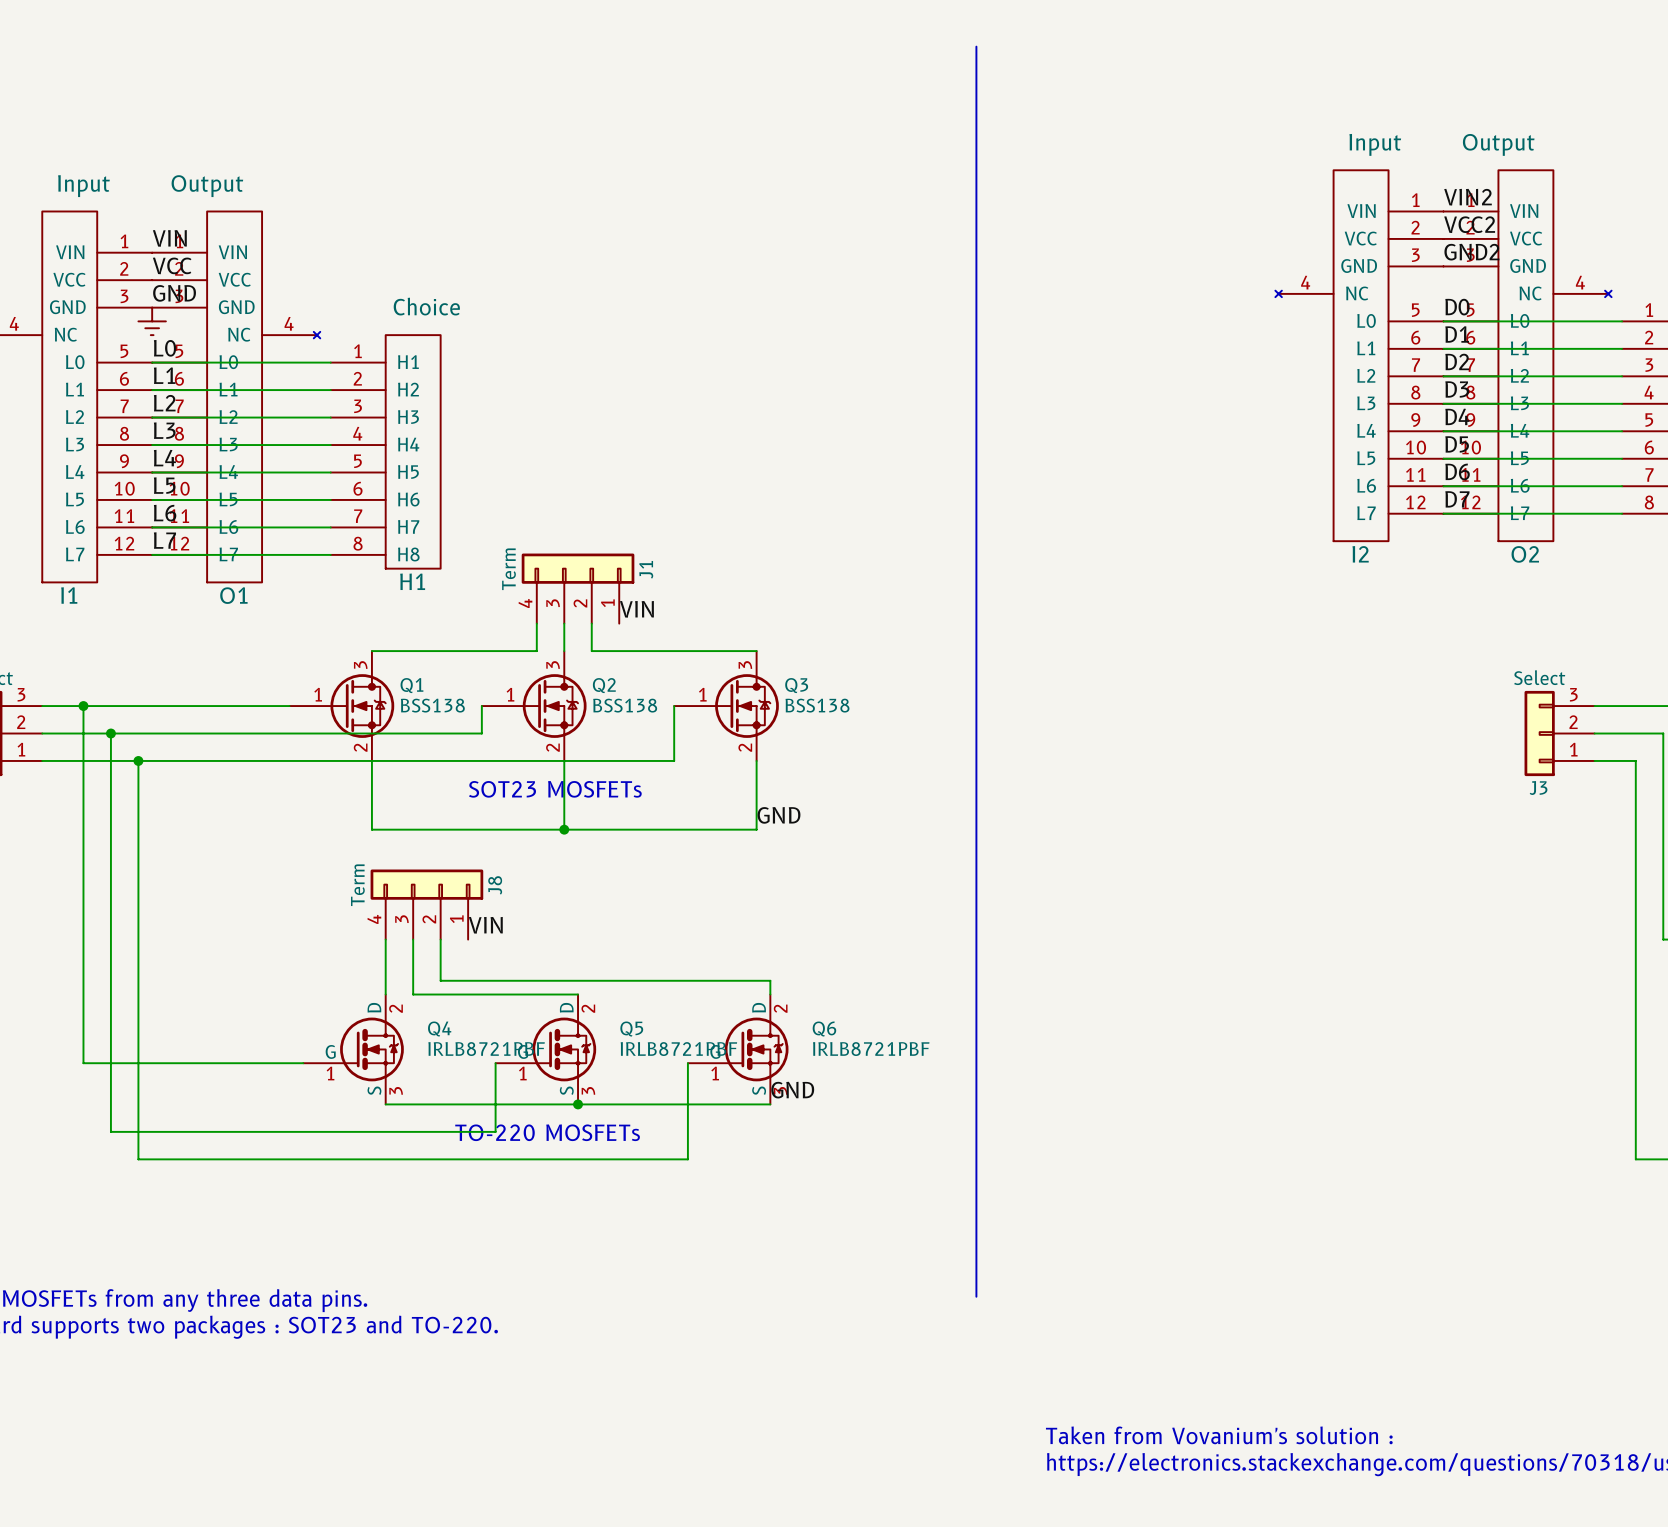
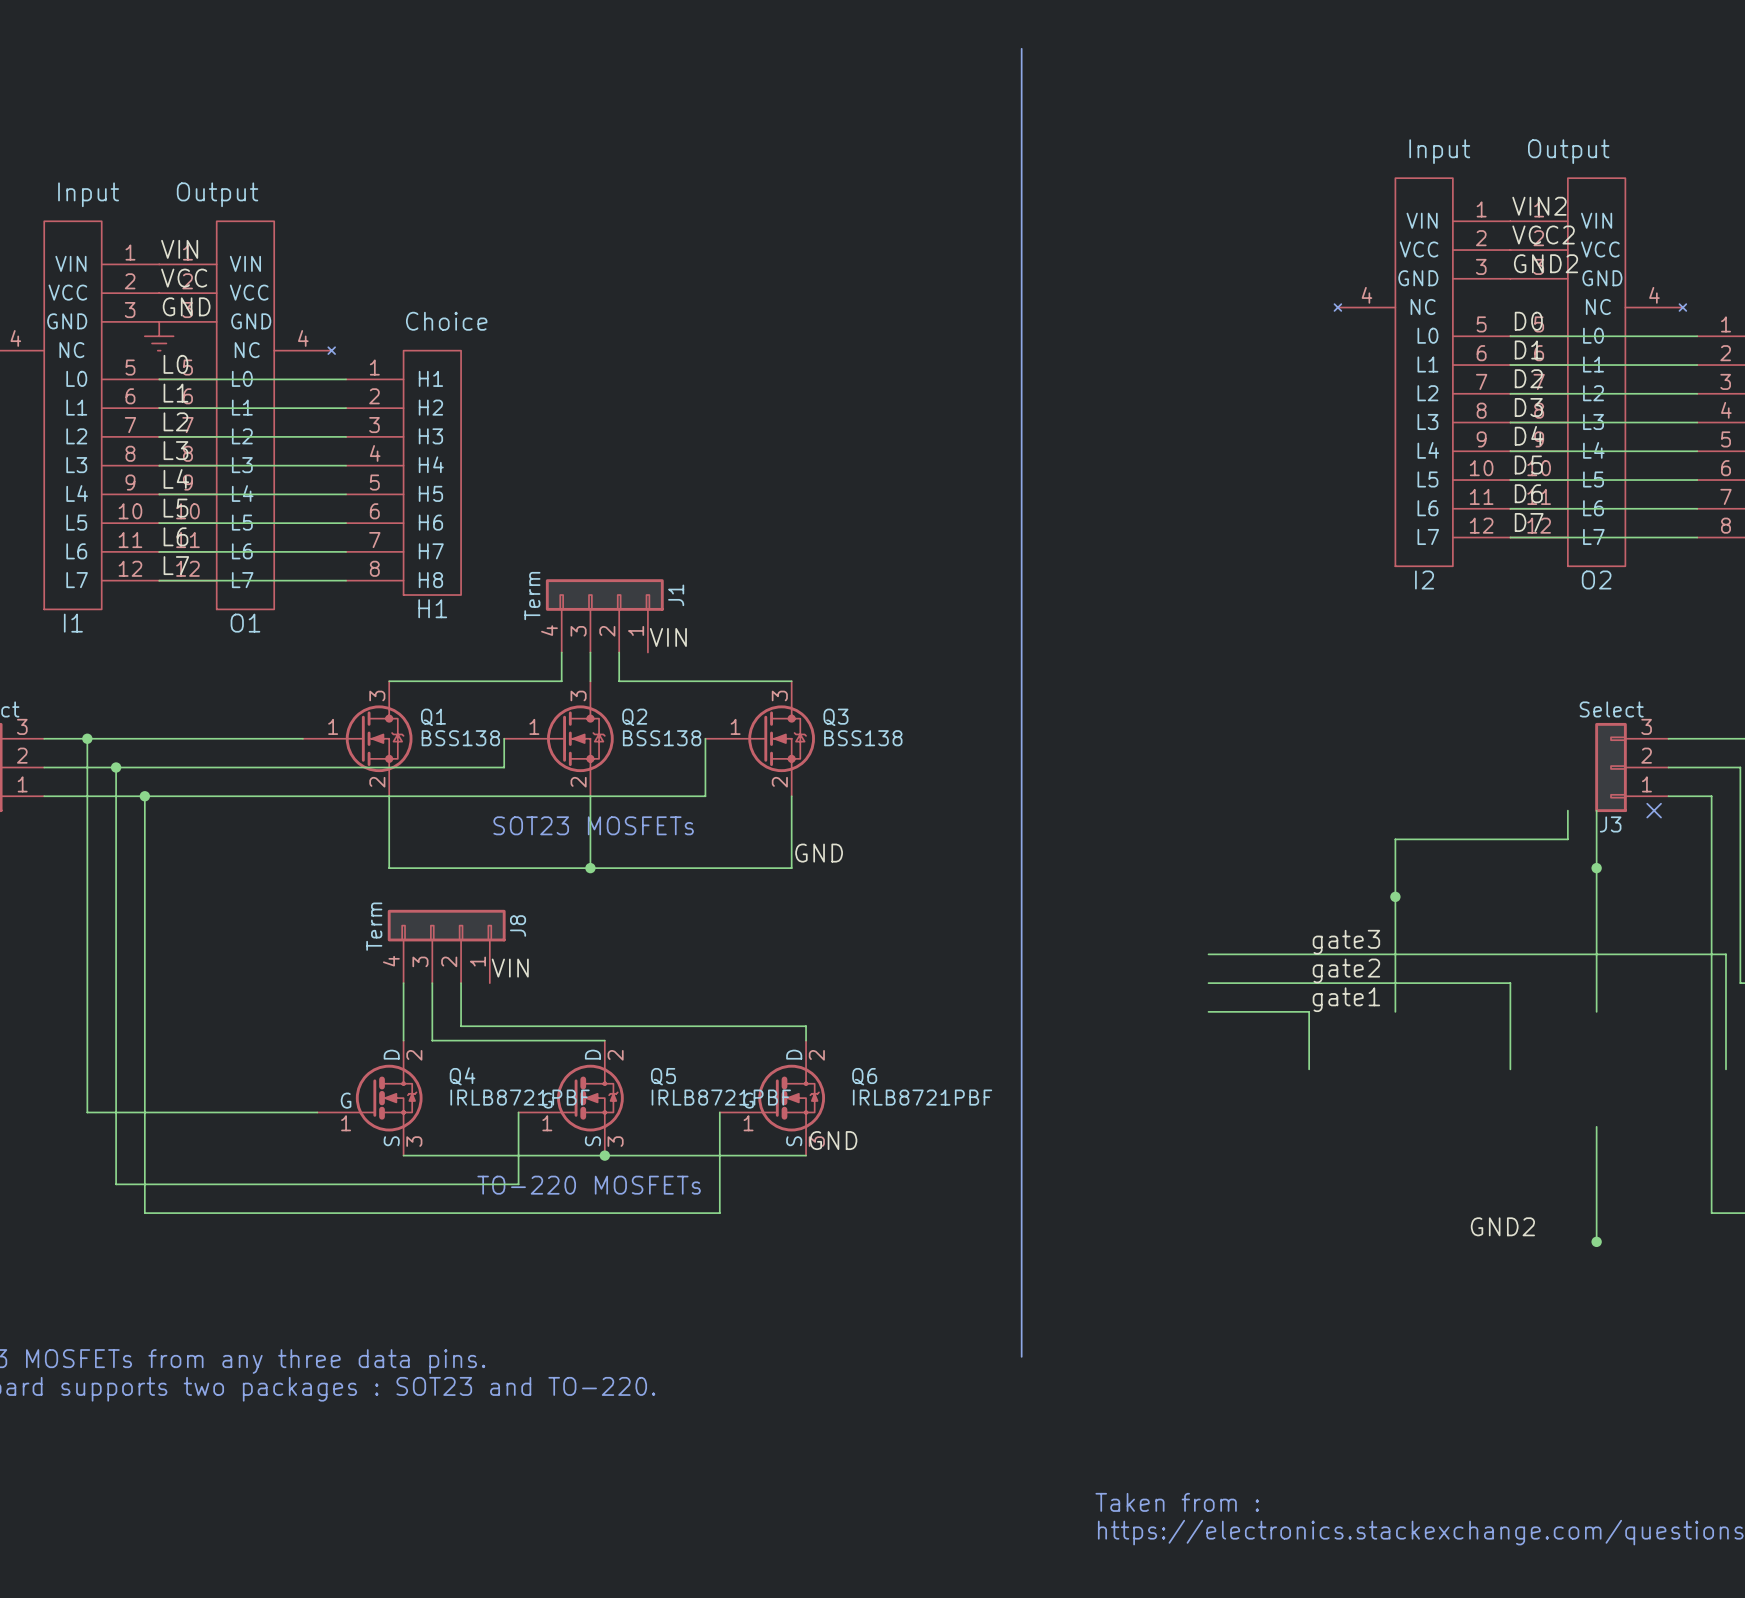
wire: none -> (1567, 810) (1567, 839) (1395, 839) (1395, 1011)
wire: none -> (1596, 810) (1596, 1011)
no-connect mark: none -> (1654, 810)
junction: none -> (1596, 868)
junction: none -> (1395, 896)
label: none -> gate3 (1346, 942)
wire: none -> (1208, 954) (1725, 954) (1725, 1069)
label: none -> gate2 (1346, 970)
wire: none -> (1208, 983) (1510, 983) (1510, 1069)
label: none -> gate1 (1346, 999)
wire: none -> (1208, 1011) (1309, 1011) (1309, 1069)
wire: none -> (1596, 1126) (1596, 1241)
label: none -> GND2 (1502, 1226)
junction: none -> (1596, 1241)
text: Taken from Vovanium's solution : (1219, 1435) -> Taken from : (1177, 1502)

